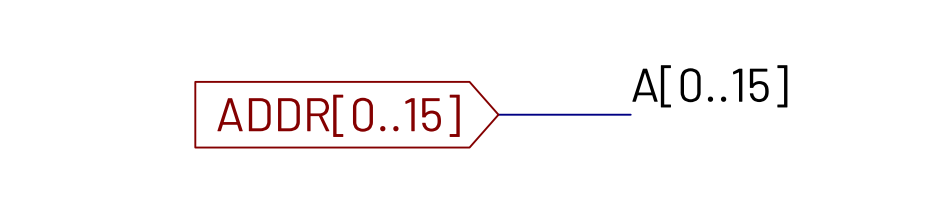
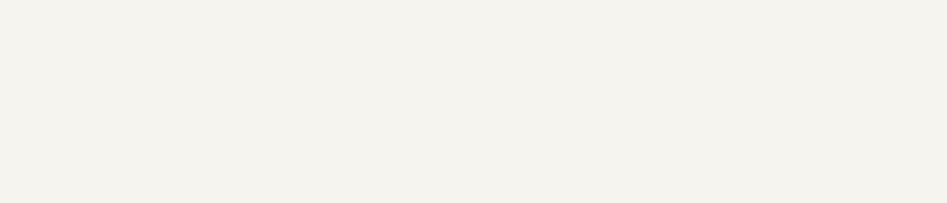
label: A[0..15] (709, 86) -> none
bus: (498, 114) (630, 114) -> none
global label: ADDR[0..15] (338, 115) -> none

